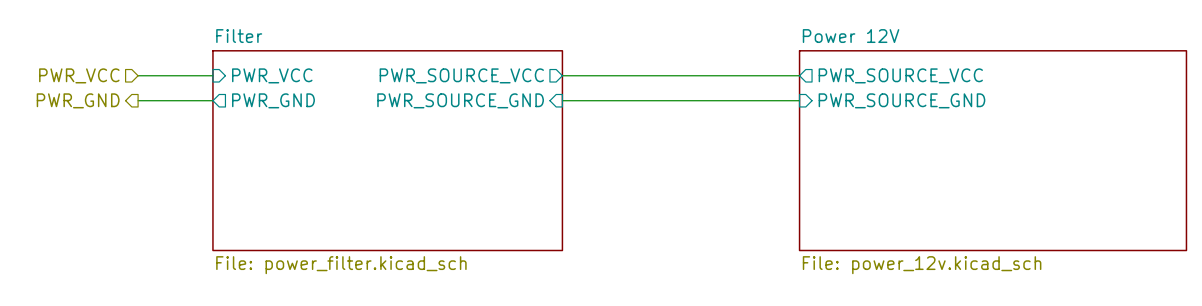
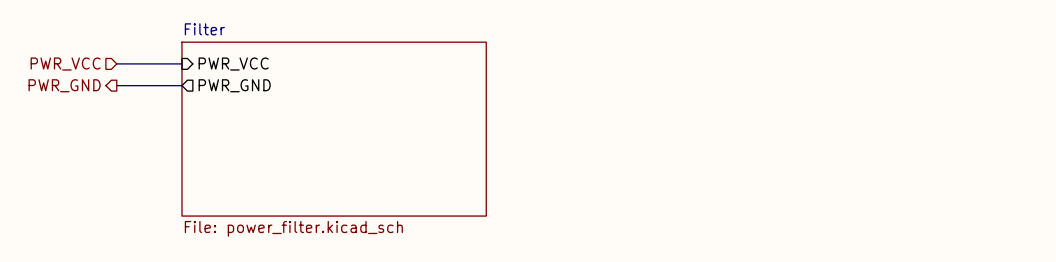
sheet pin: PWR_SOURCE_VCC (461, 75) -> none
wire: (562, 75) (799, 75) -> none
sheet pin: PWR_SOURCE_VCC (900, 75) -> none
sheet pin: PWR_SOURCE_GND (460, 100) -> none
wire: (562, 100) (799, 100) -> none
sheet pin: PWR_SOURCE_GND (901, 100) -> none
sheet Power 12V: File: power_12v.kicad_sch (993, 150) -> none

